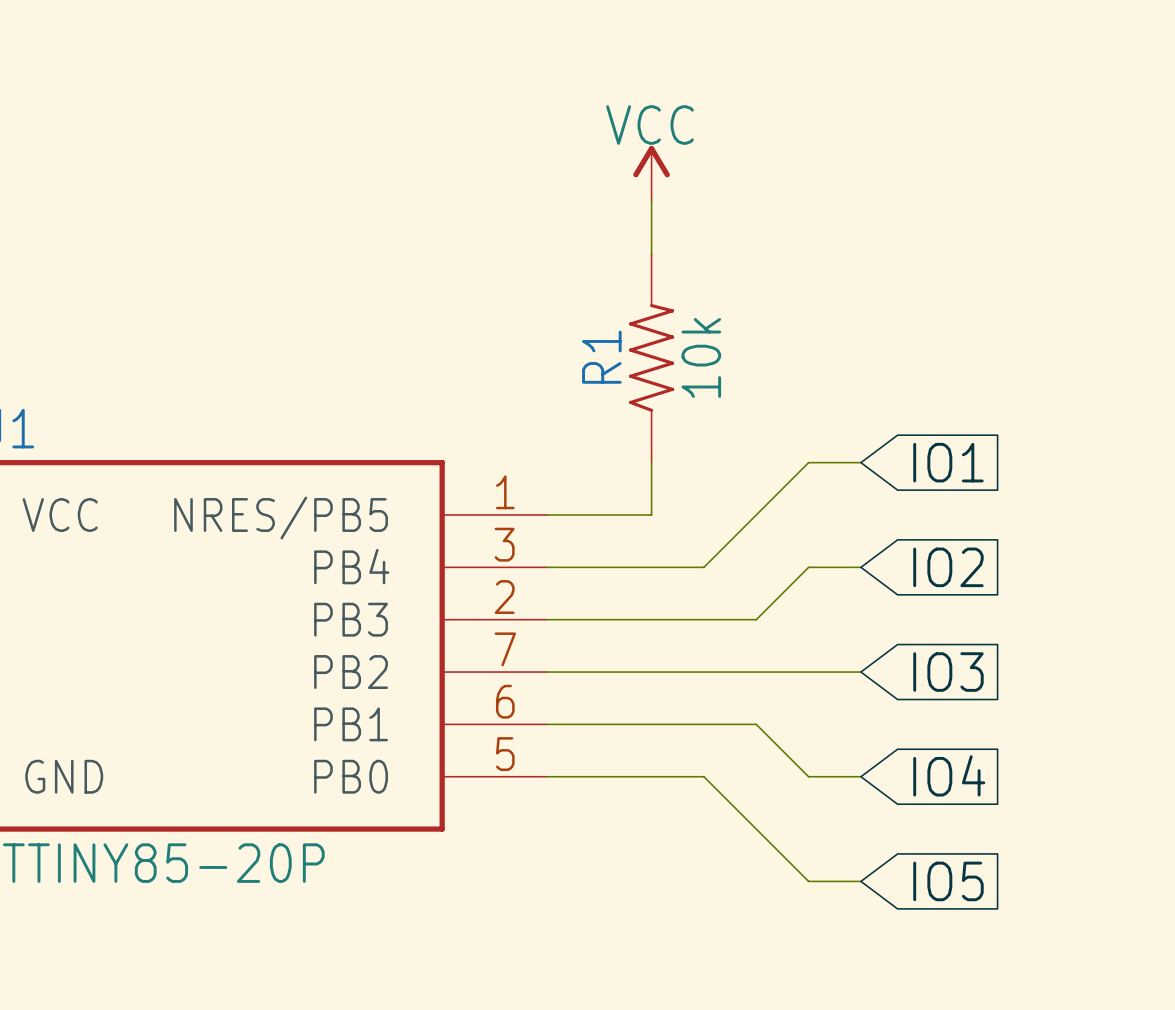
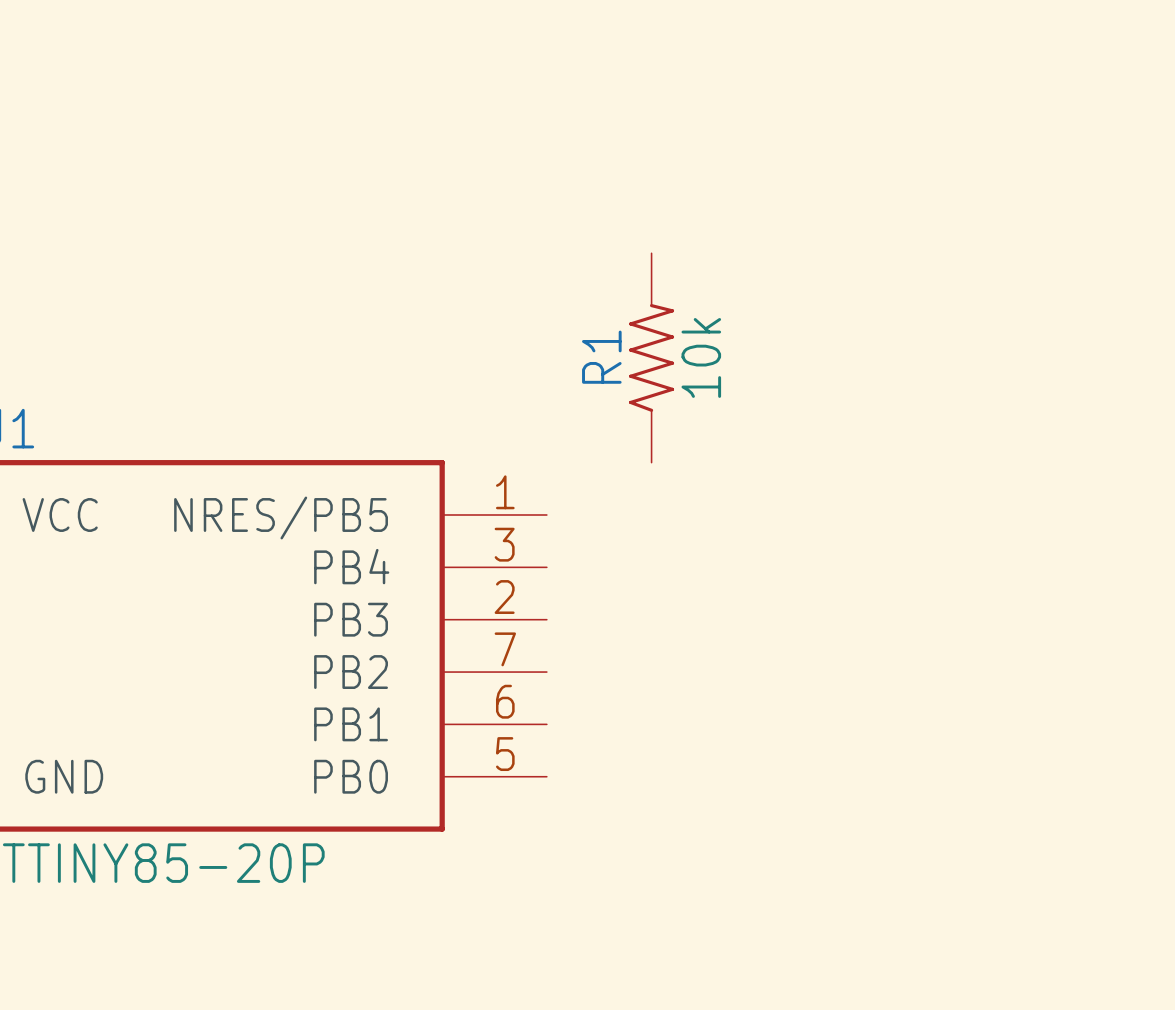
power symbol: VCC (651, 173) -> none
wire: (651, 200) (651, 253) -> none
wire: (651, 462) (651, 515) (546, 515) -> none
wire: (860, 462) (808, 462) (703, 567) (546, 567) -> none
global label: IO1 (948, 462) -> none
wire: (860, 567) (808, 567) (756, 619) (546, 619) -> none
global label: IO2 (948, 567) -> none
wire: (546, 672) (860, 672) -> none
global label: IO3 (948, 672) -> none
wire: (546, 724) (756, 724) (808, 776) (860, 776) -> none
global label: IO4 (949, 775) -> none
wire: (546, 776) (703, 776) (808, 881) (860, 881) -> none
global label: IO5 (948, 881) -> none

